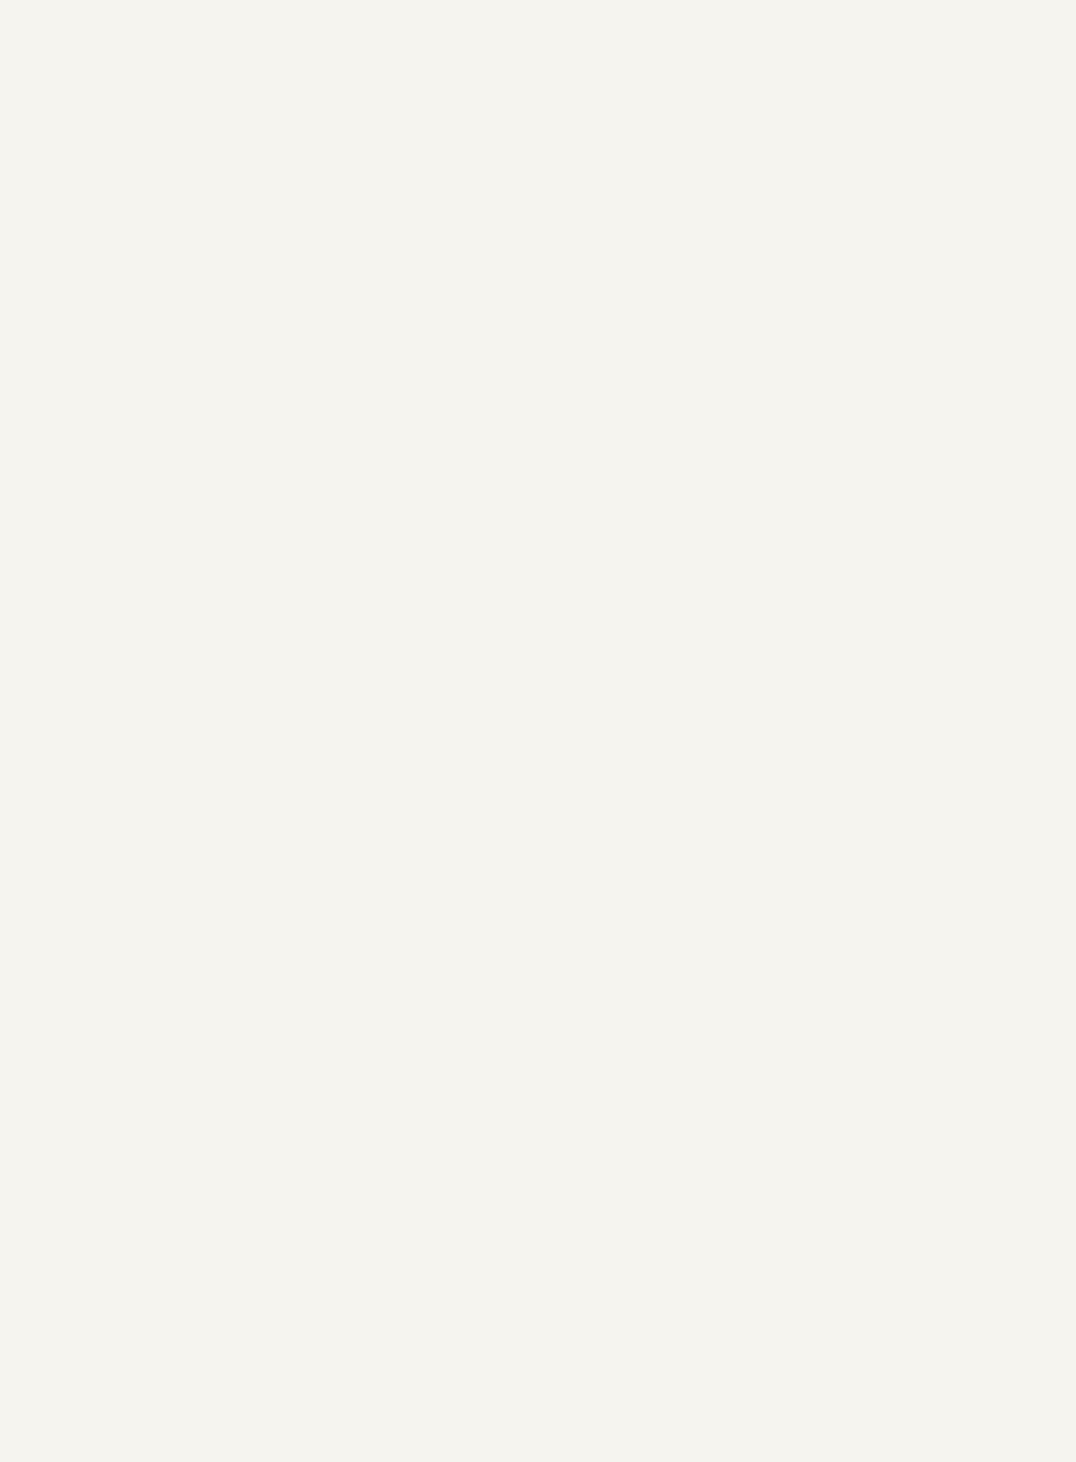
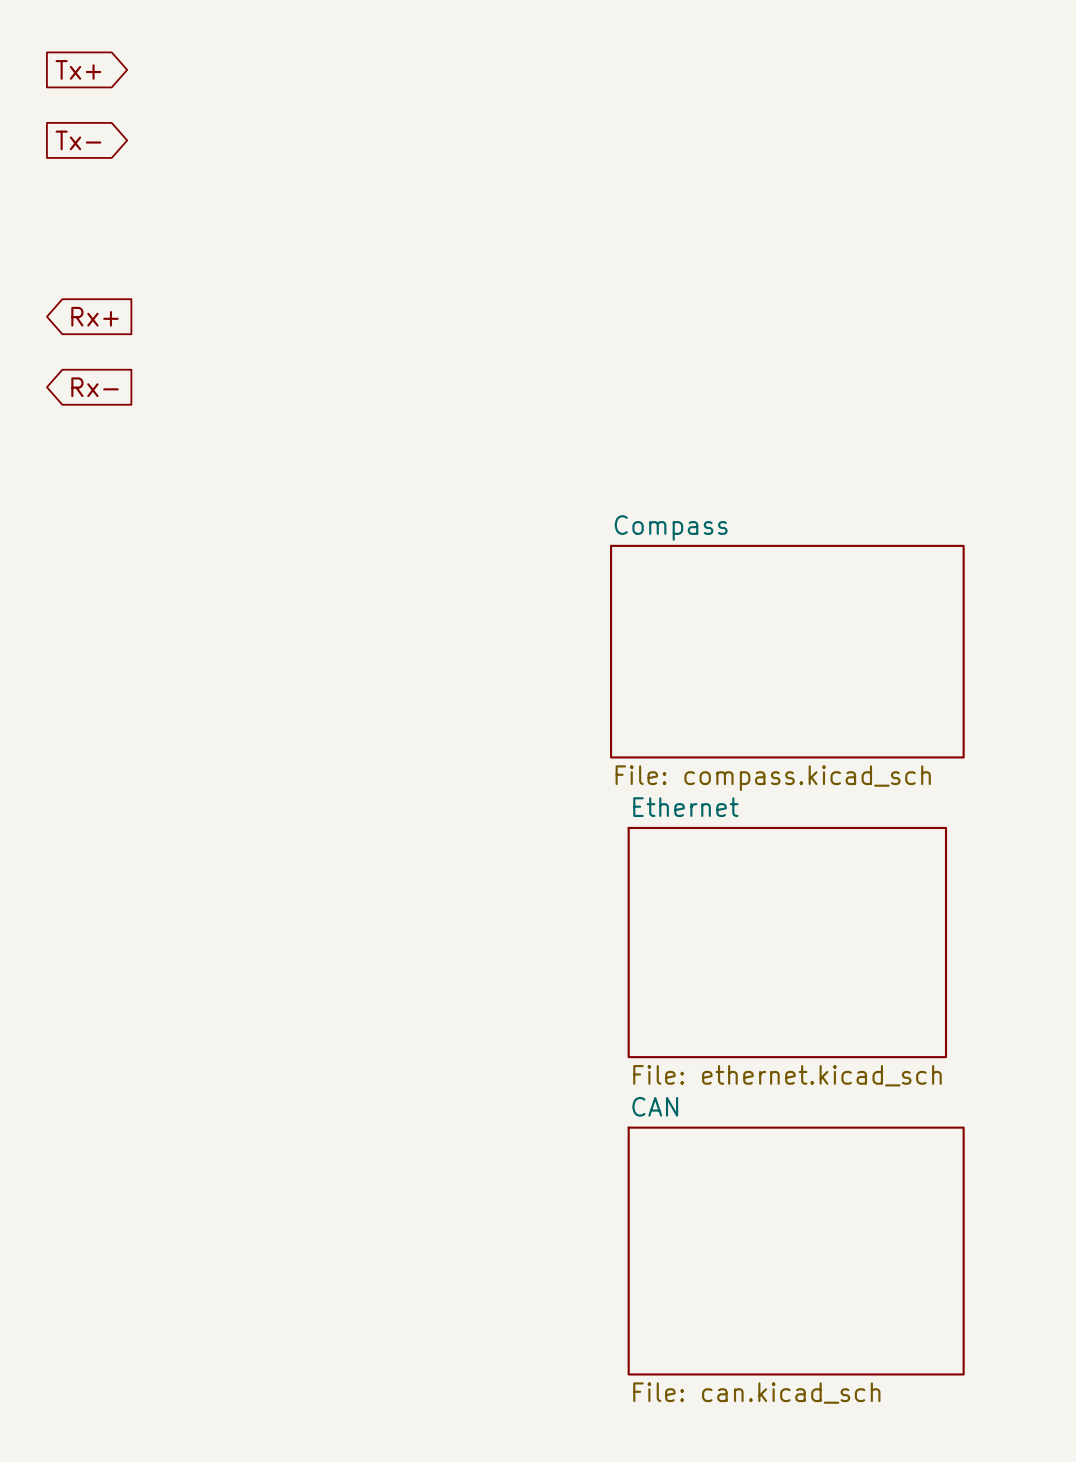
global label: none -> Tx+ (78, 69)
global label: none -> Tx- (78, 140)
global label: none -> Rx+ (95, 316)
global label: none -> Rx- (95, 387)
sheet Compass: none -> File: compass.kicad_sch (787, 651)
sheet Ethernet: none -> File: ethernet.kicad_sch (787, 942)
sheet CAN: none -> File: can.kicad_sch (796, 1251)

